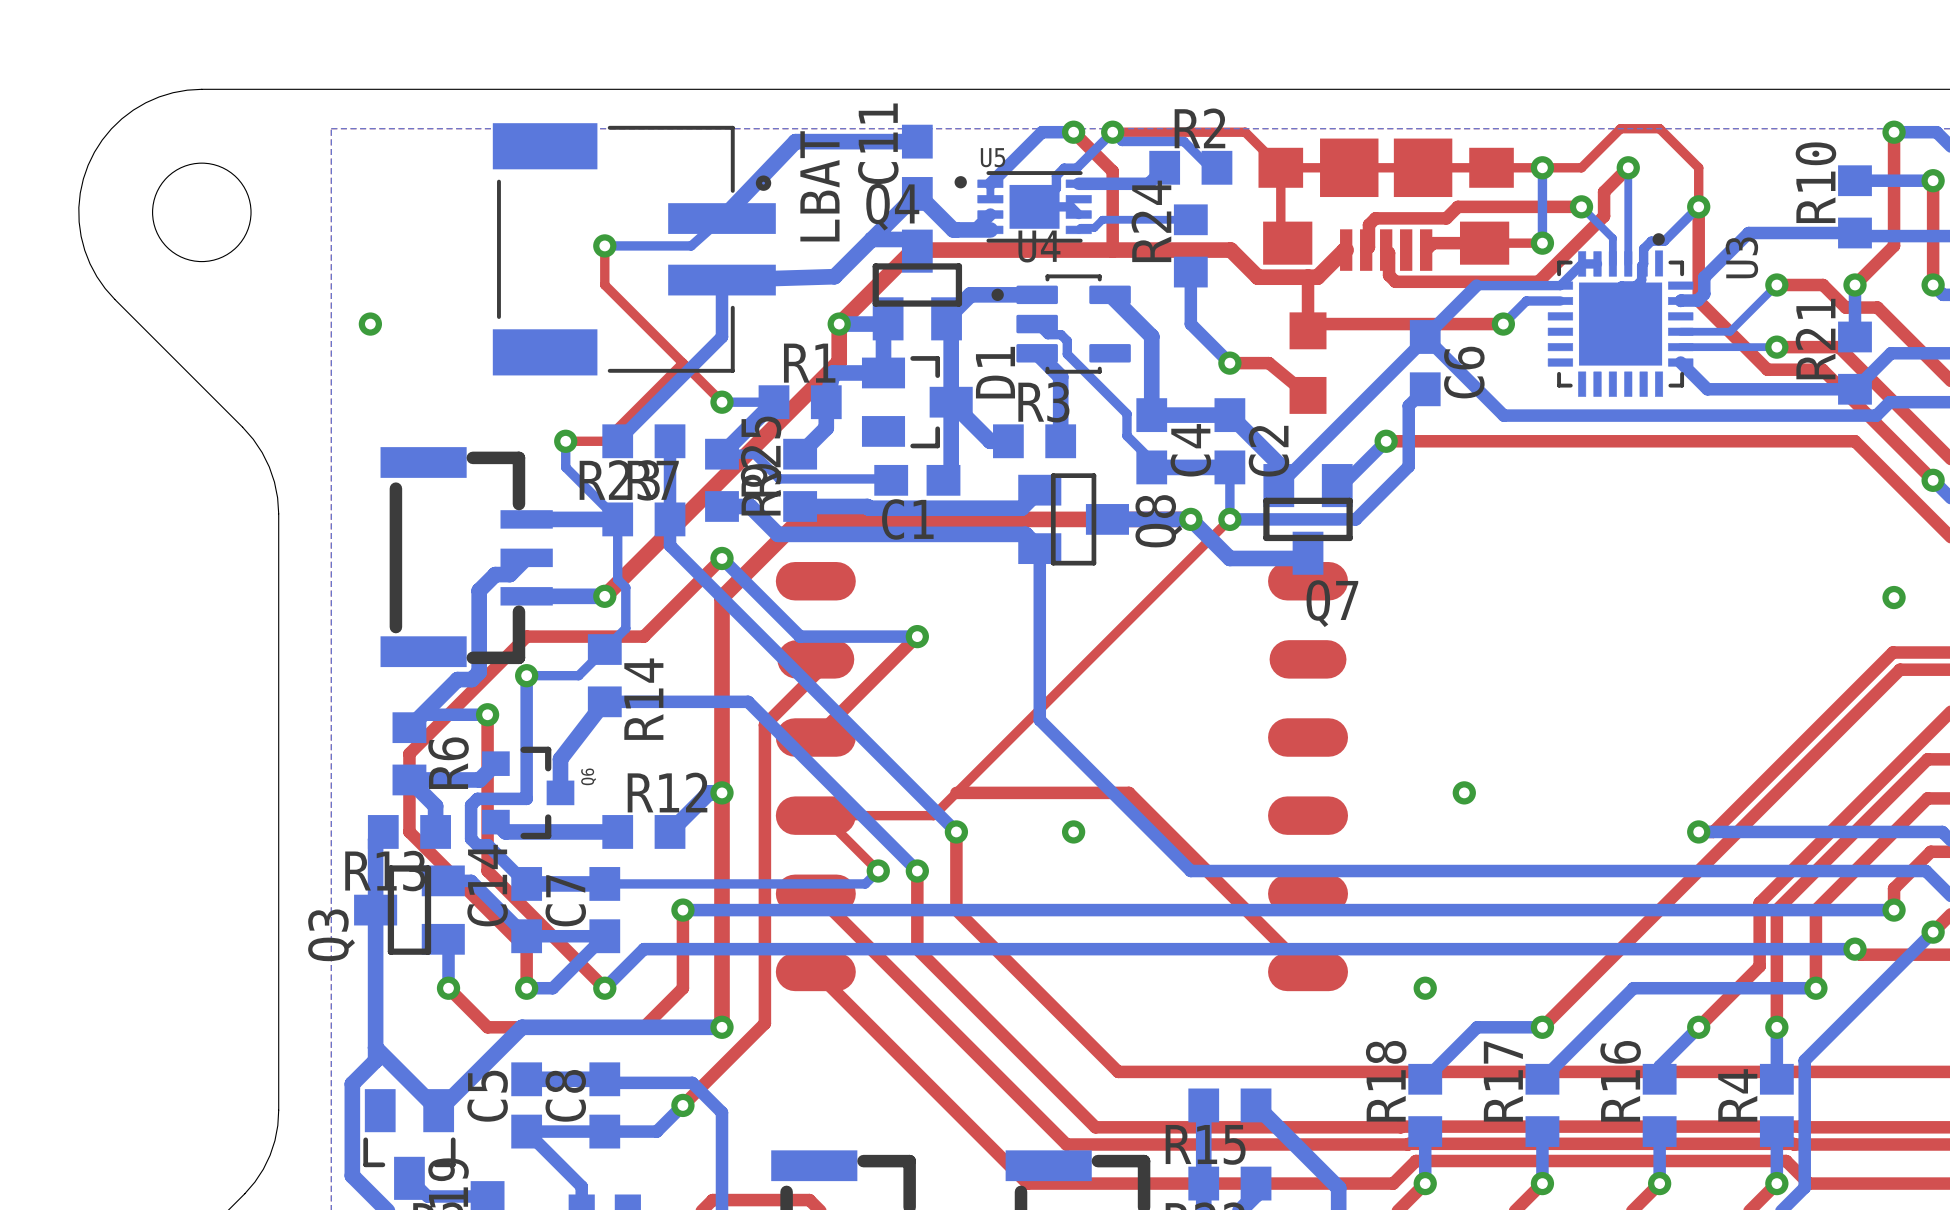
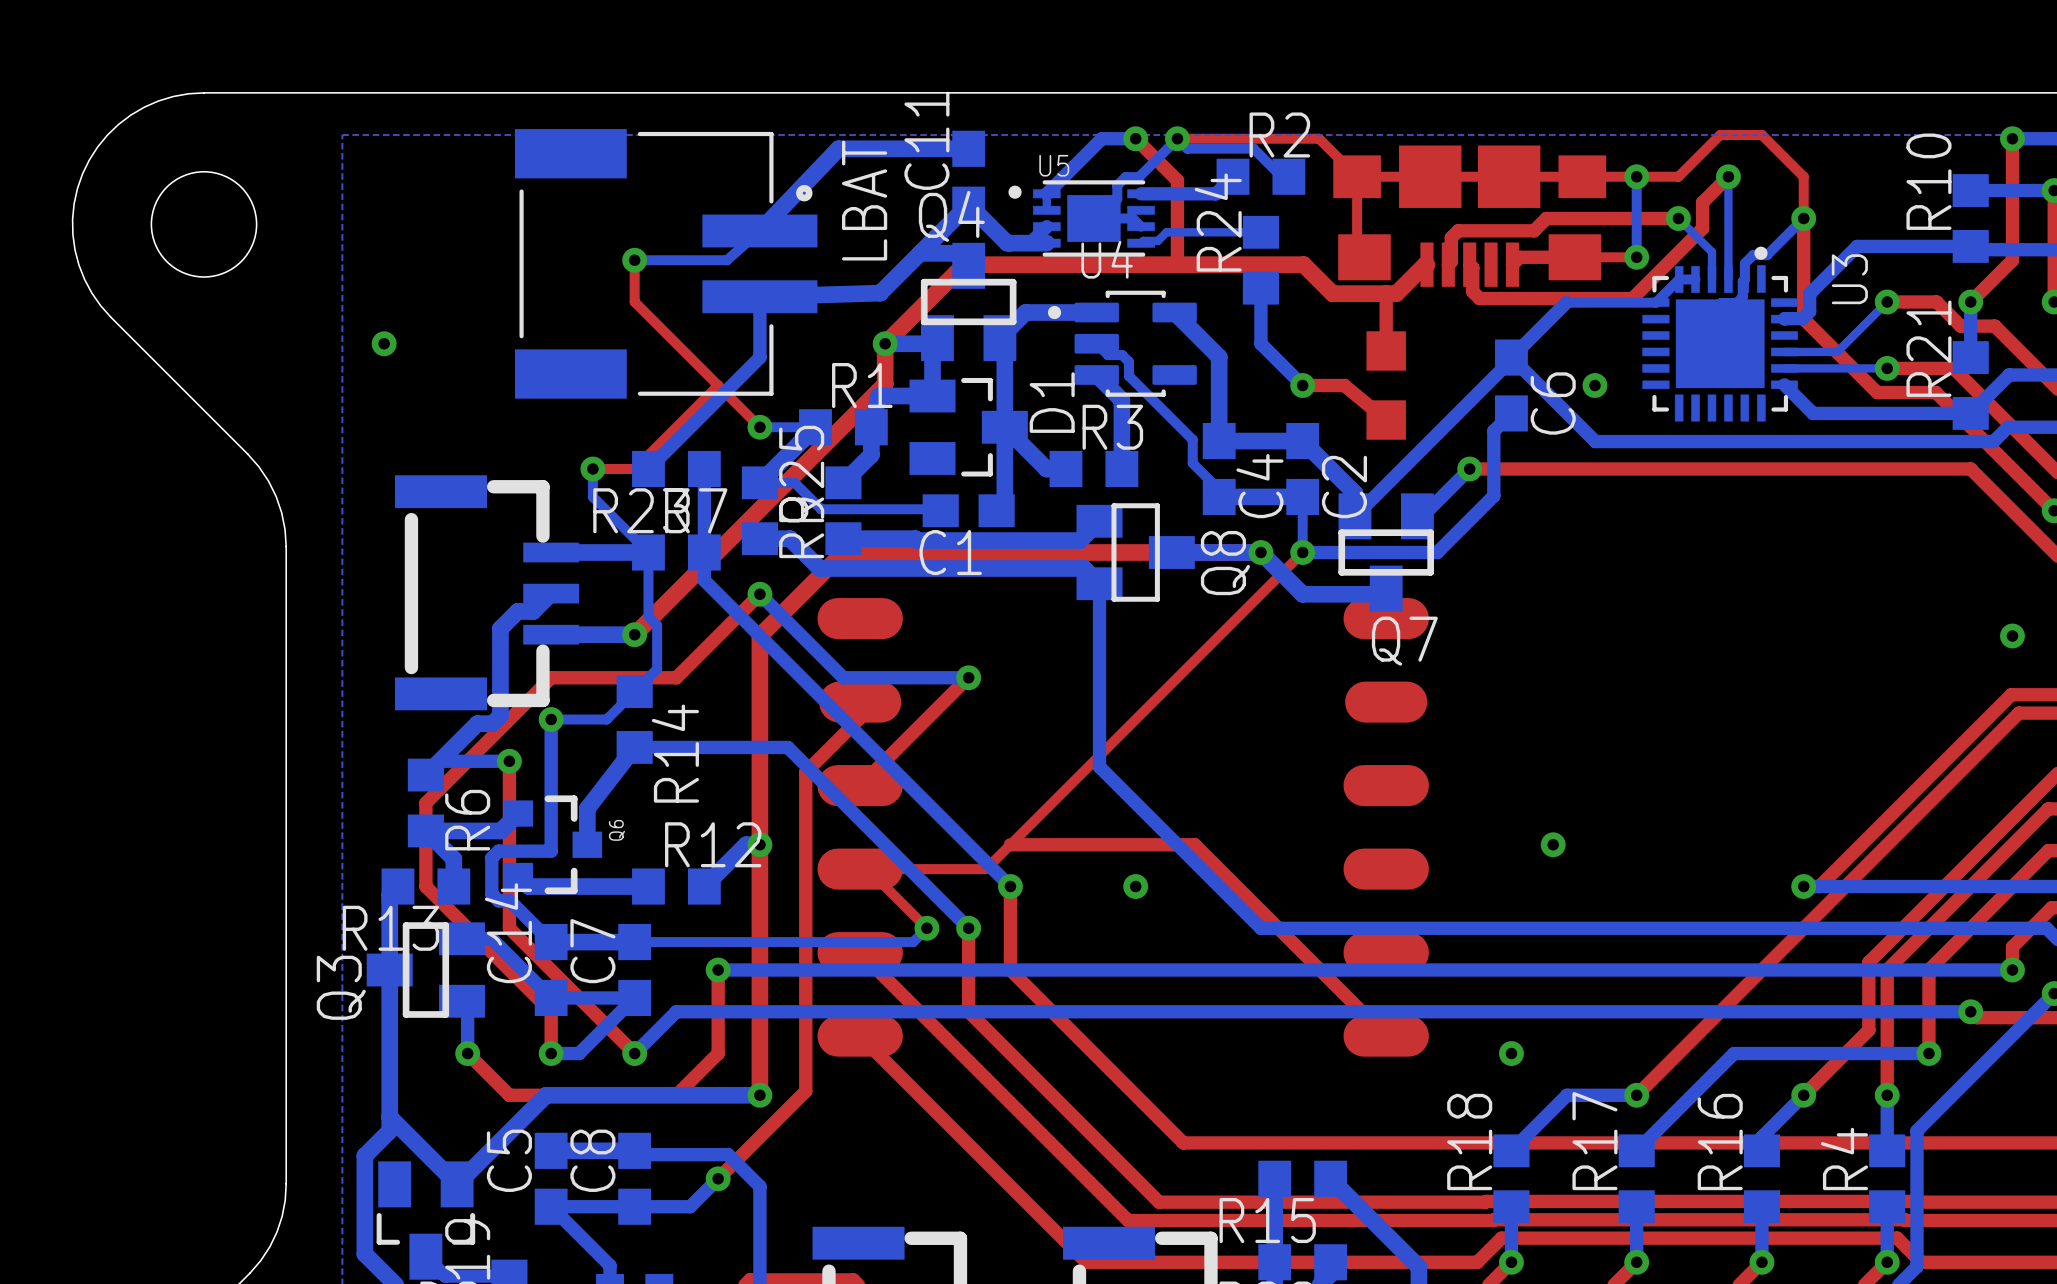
bottom track: (1560, 300) (1526, 300) (1503, 324) -> none
top track: (1503, 324) (1314, 324) (1308, 330) -> none
via position: (1503, 324) -> (1594, 385)

